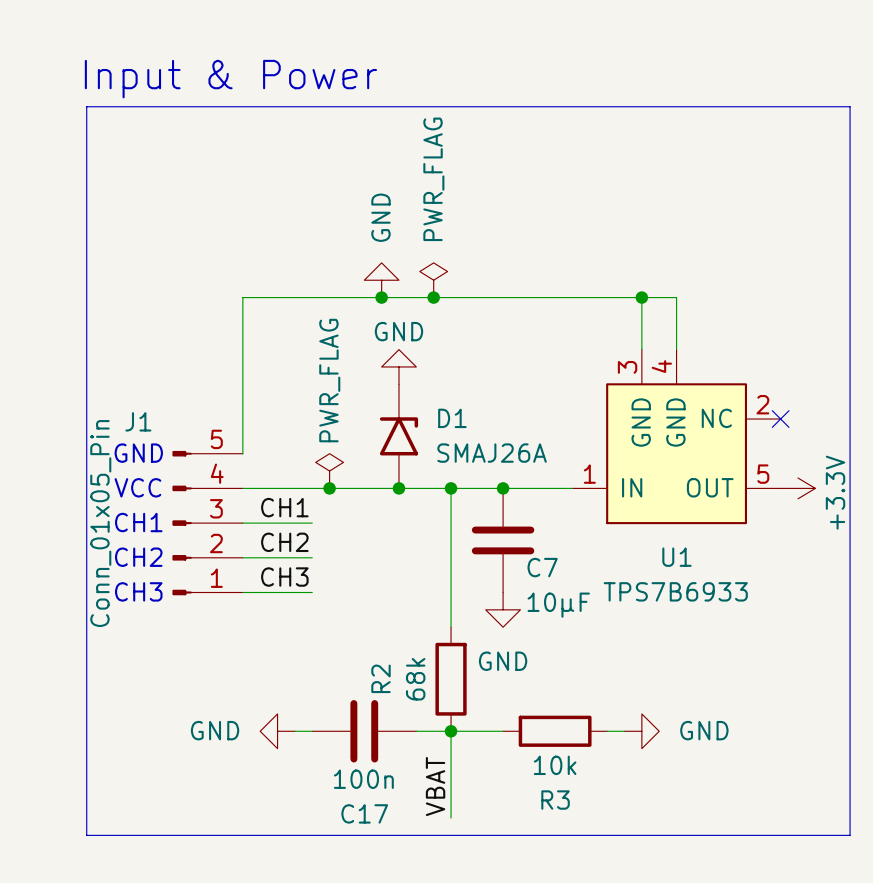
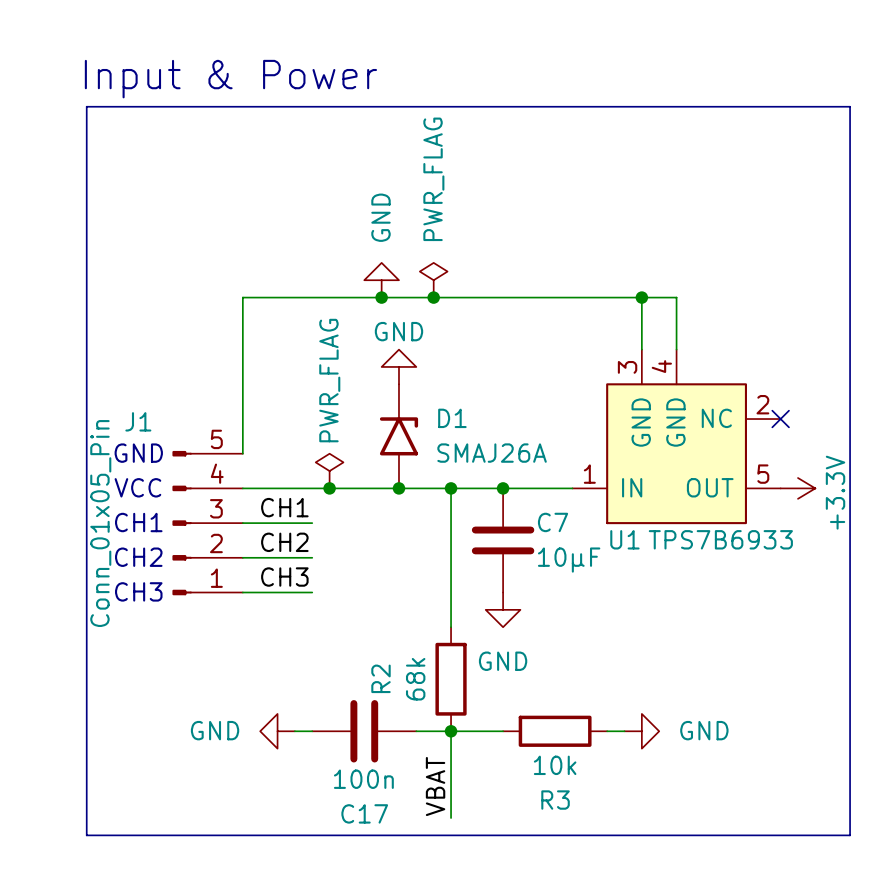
U1 name position: U1 (676, 557) -> U1 (624, 539)
C7 name position: C7 (542, 567) -> C7 (553, 522)
U1 value position: TPS7B6933 (675, 591) -> TPS7B6933 (720, 539)
C7 value position: 10µF (558, 605) -> 10µF (569, 560)

